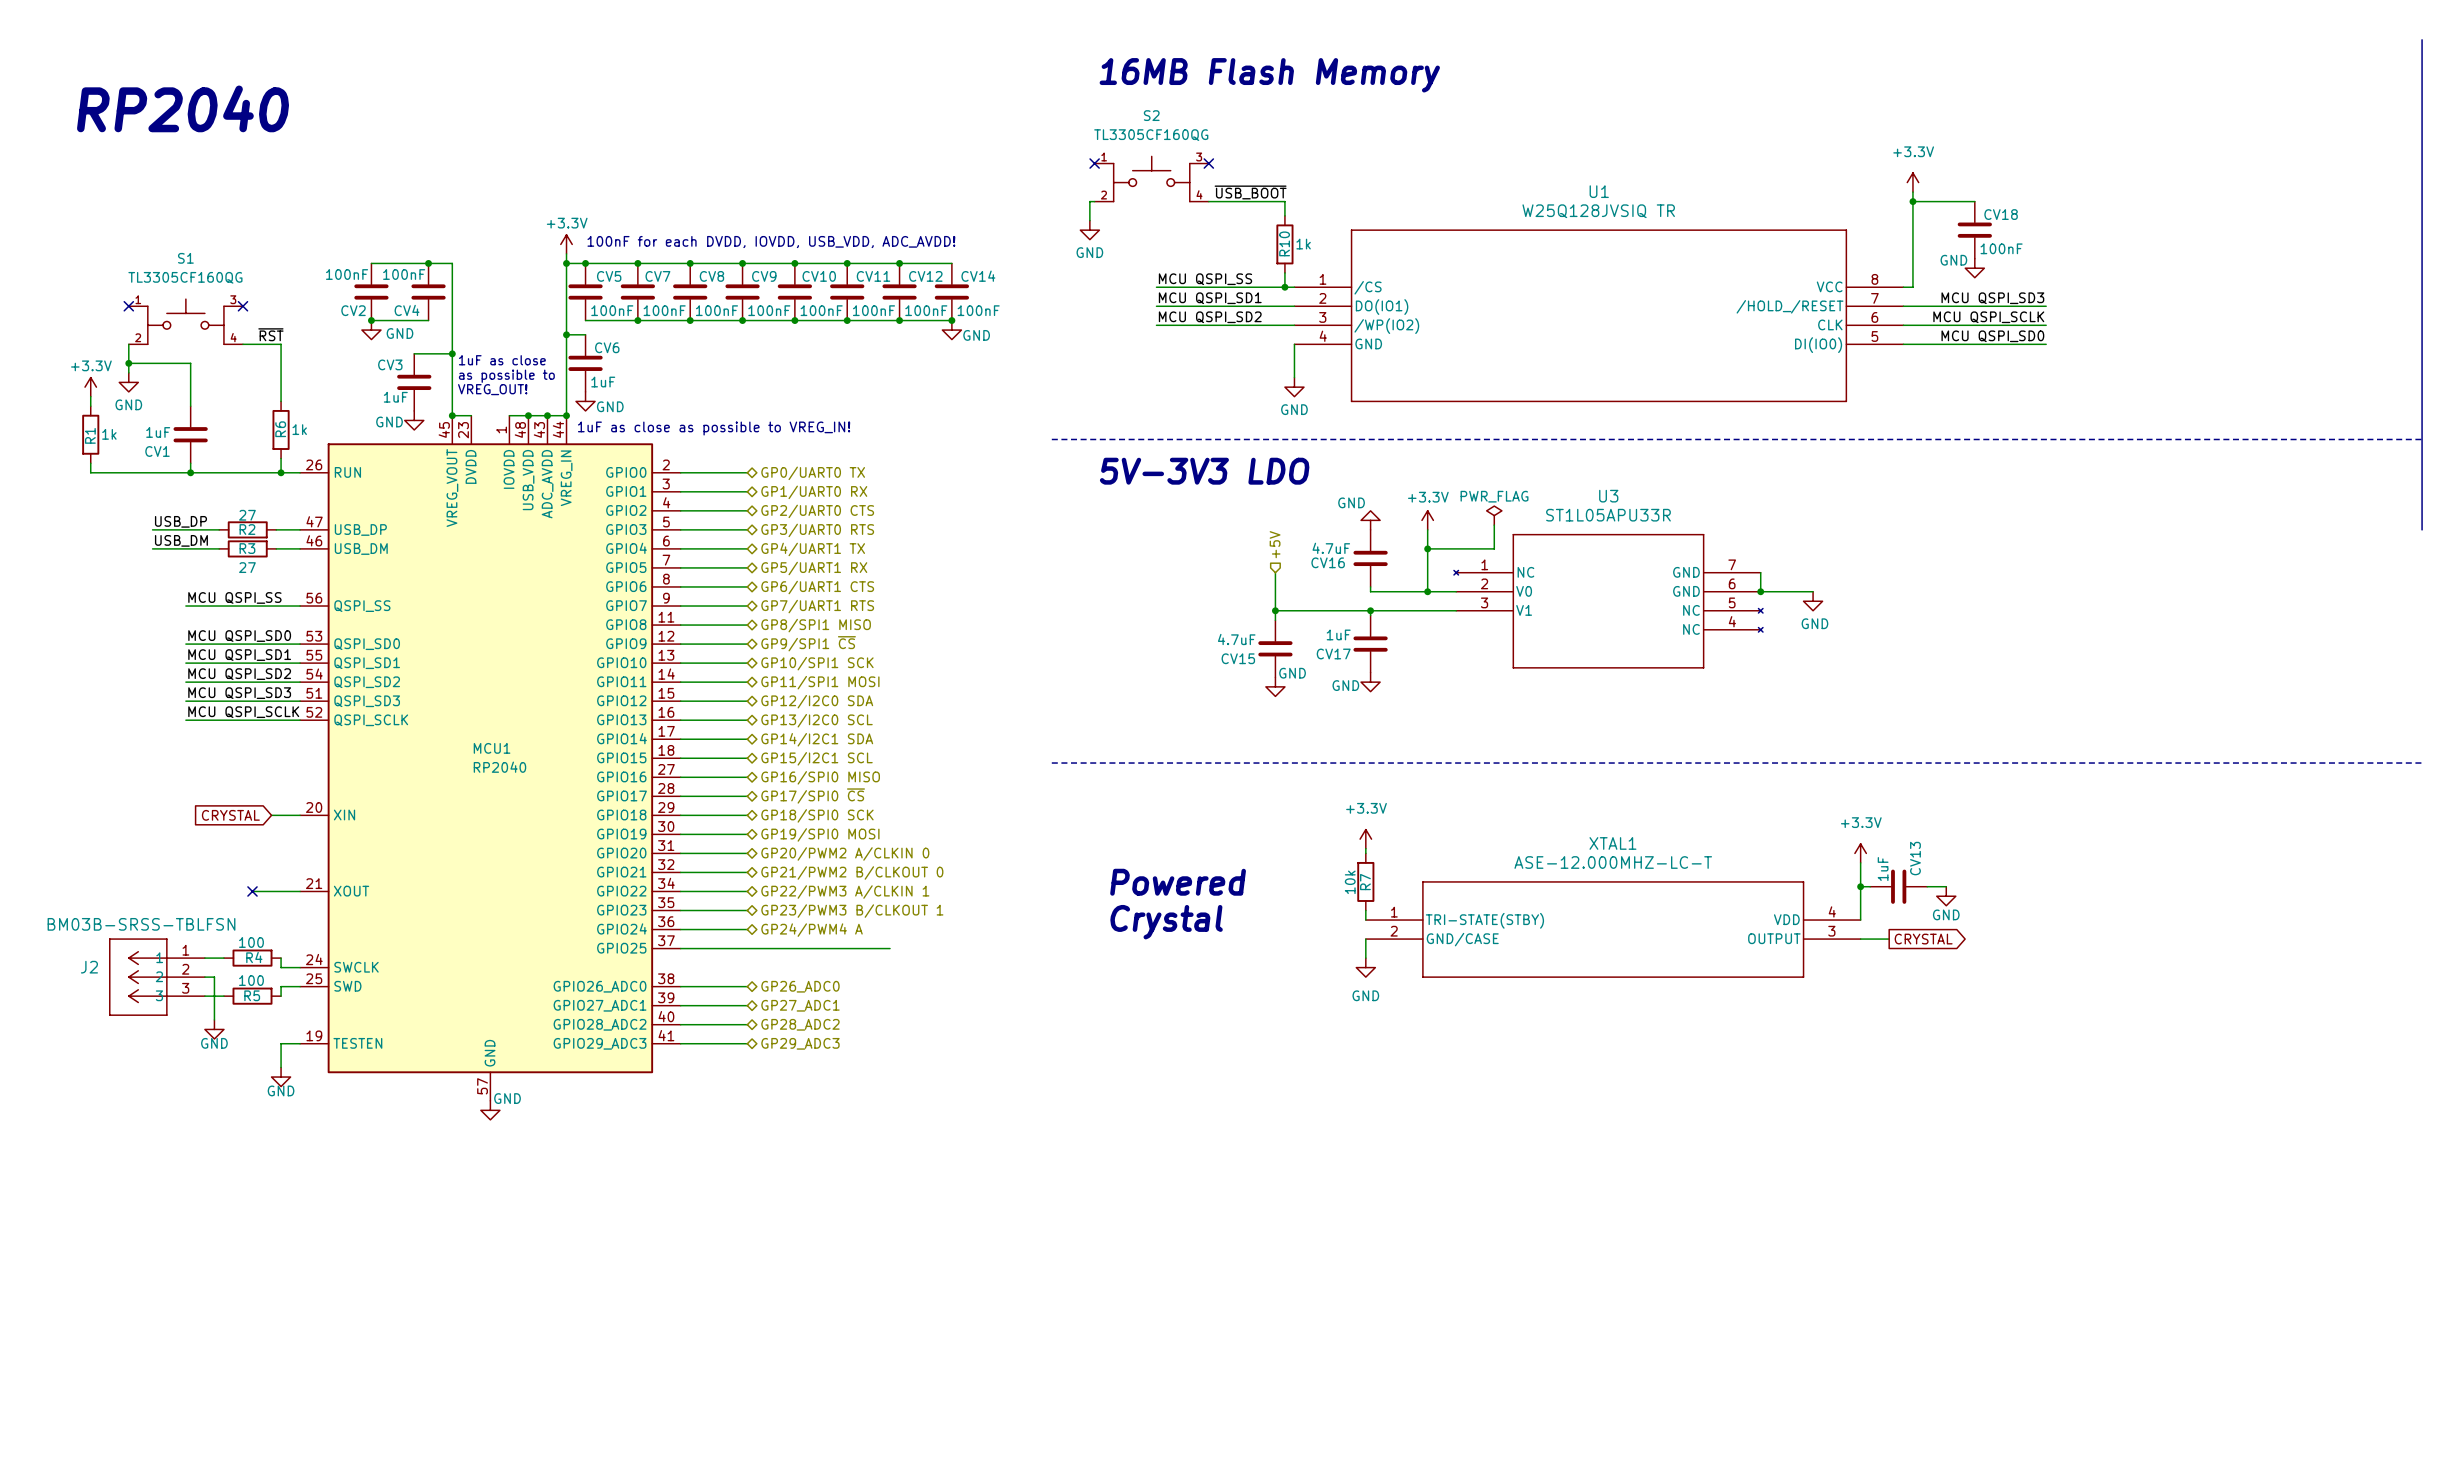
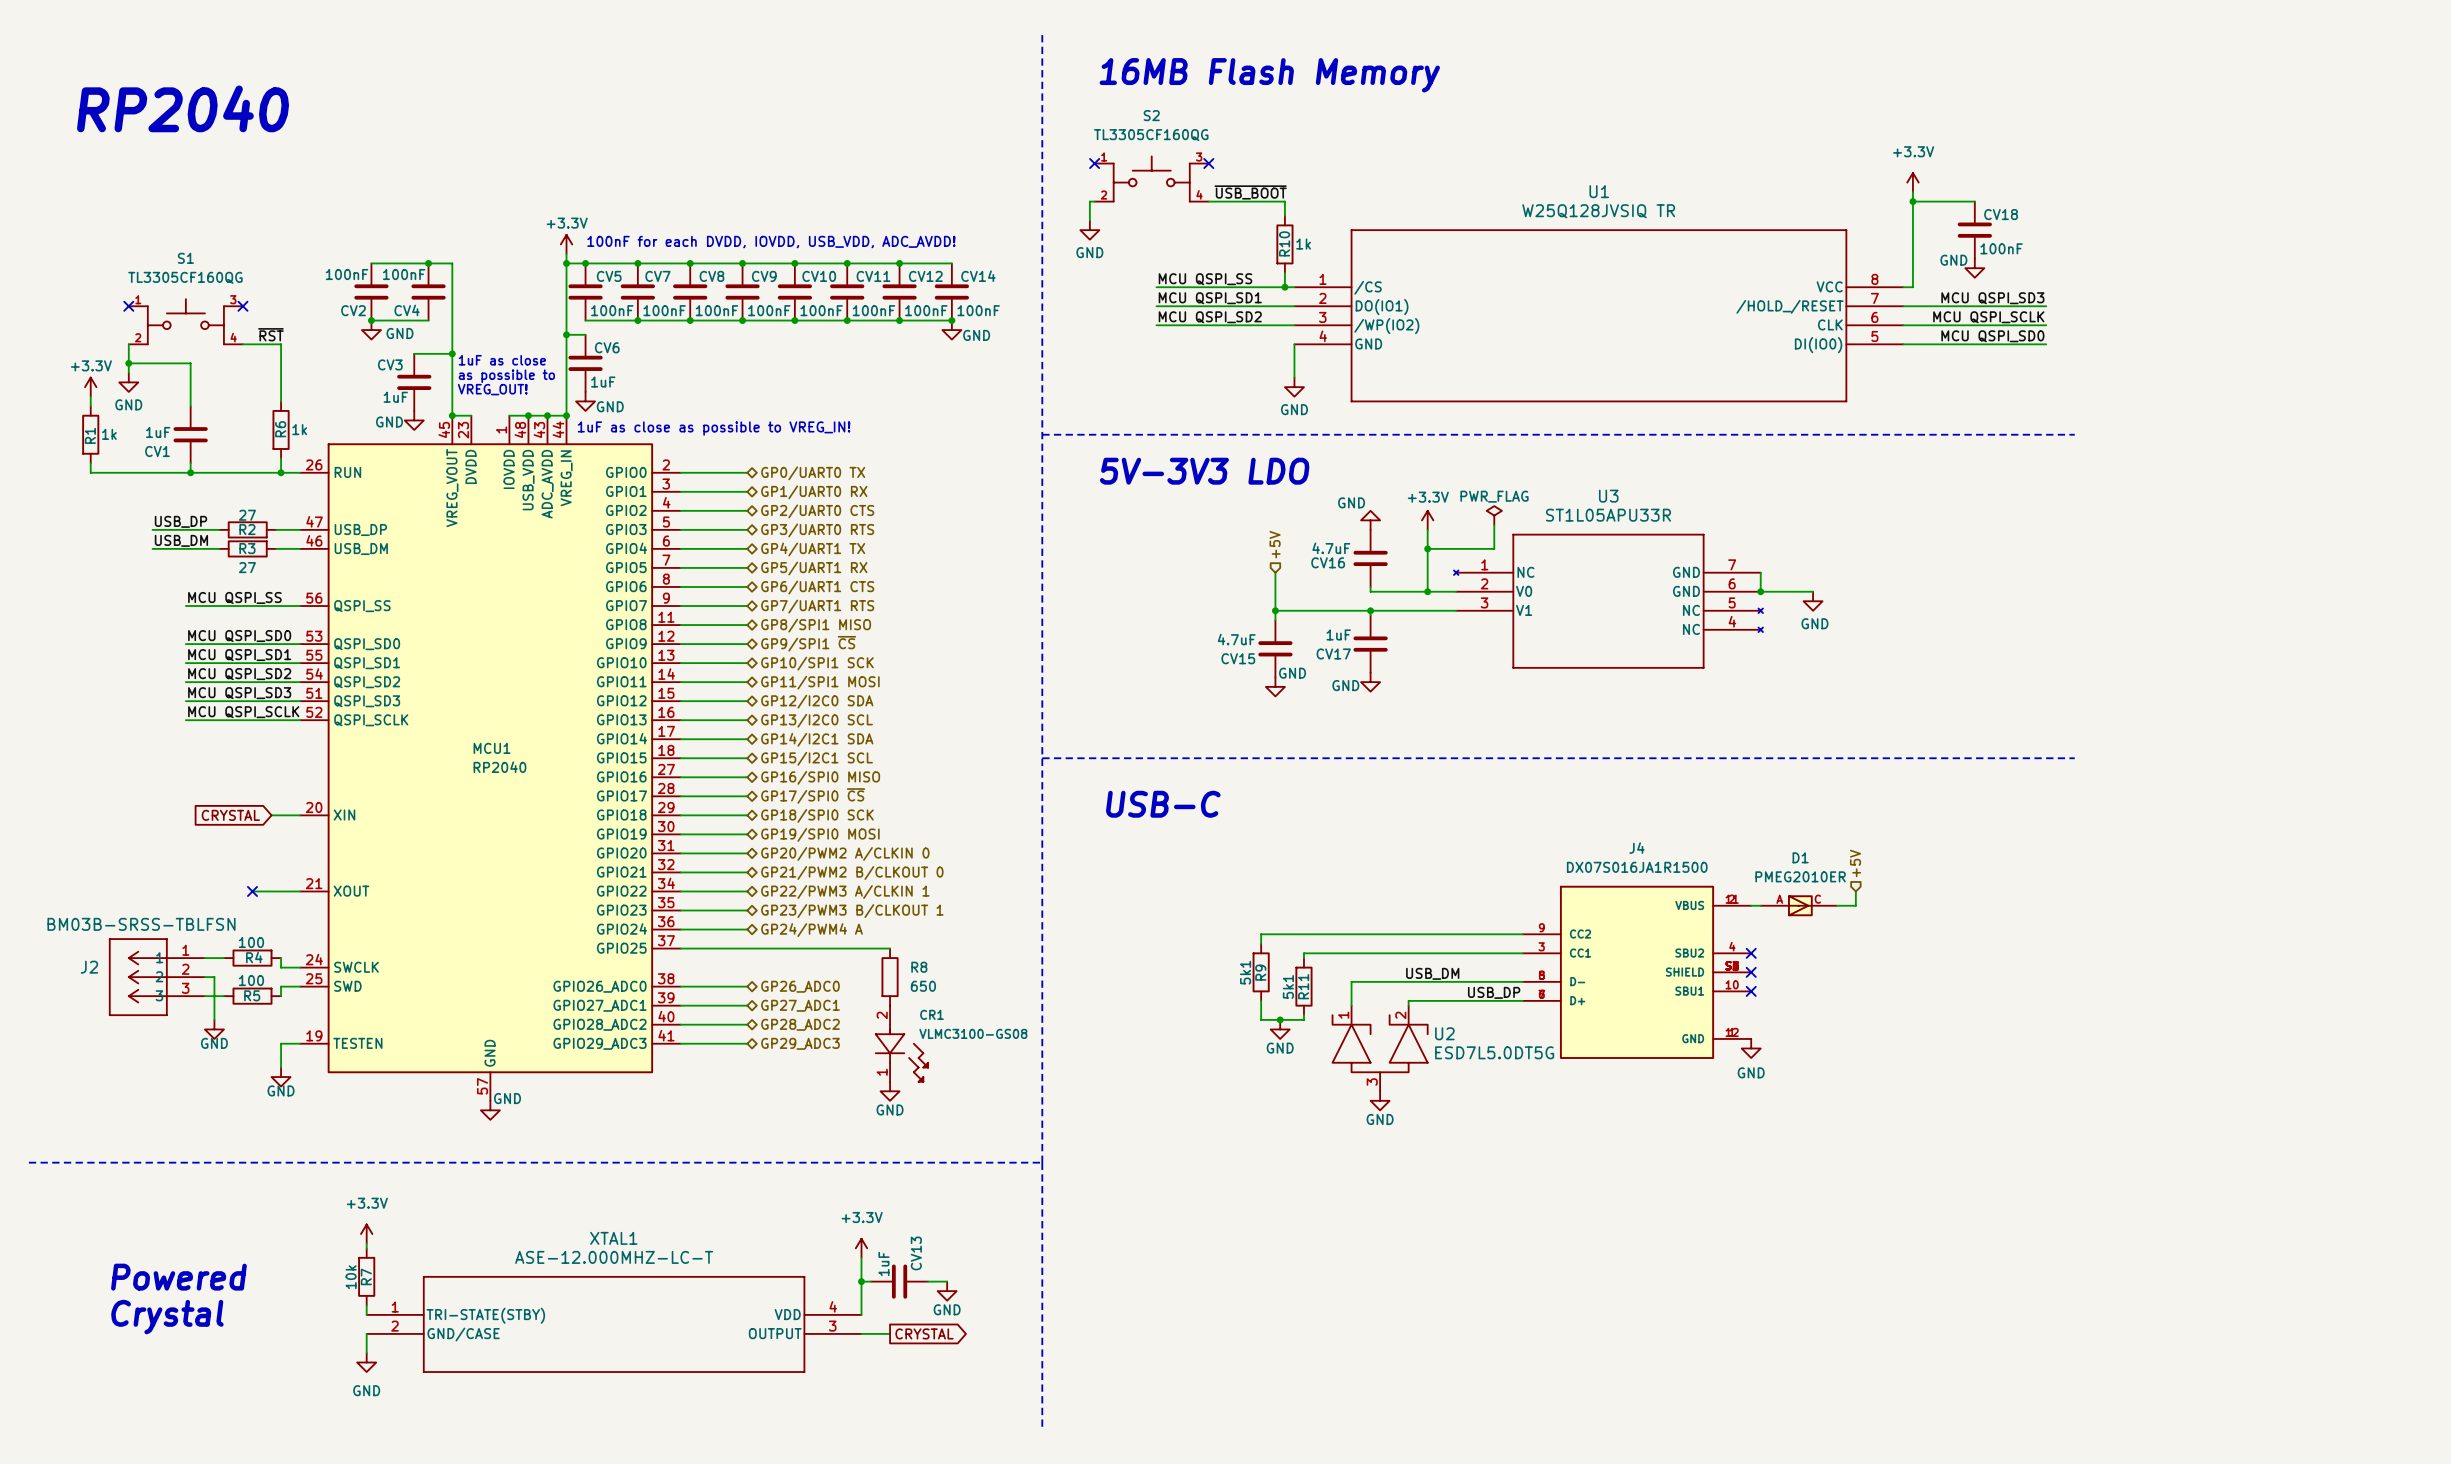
line: none -> (1042, 35) (1042, 1429)
line: (2422, 39) (2422, 529) -> none
line: none -> (1042, 434) (2074, 434)
line: (1051, 439) (2422, 439) -> none
line: none -> (1042, 758) (2074, 758)
line: (1051, 763) (2422, 763) -> none
text: none -> USB-C (1163, 804)
power symbol: +3.3V (1365, 839) -> none
wire: (1365, 848) (1365, 853) -> none
power symbol: +3.3V (1860, 853) -> none
wire: (1860, 862) (1860, 920) -> none
hierarchical label: none -> +5V (1855, 863)
R7 position: (1365, 881) -> (366, 1276)
text: Powered (1178, 882) -> none
wire: (1860, 886) (1870, 886) -> (1751, 905) (1760, 905)
junction: (1860, 886) -> none
CV13 position: (1898, 886) -> (899, 1281)
wire: (1927, 886) (1946, 886) -> none
wire: none -> (1855, 891) (1855, 905) (1836, 905)
power symbol: GND (1946, 896) -> none
D1: none -> PMEG2010ER (1798, 905)
wire: (1365, 910) (1365, 920) -> none
text: Crystal (1166, 922) -> none
XTAL1 position: (1613, 929) -> (614, 1324)
wire: none -> (1522, 934) (1261, 934) (1261, 943)
wire: (1365, 939) (1365, 958) -> none
wire: (1860, 939) (1889, 939) -> none
global label: CRYSTAL (1923, 939) -> none
wire: none -> (1522, 953) (1303, 953) (1303, 958)
no-connect mark: none -> (1751, 953)
power symbol: GND (1365, 967) -> none
R9: none -> 5k1 (1261, 972)
J4: none -> DX07S016JA1R1500 (1637, 972)
no-connect mark: none -> (1751, 972)
label: none -> USB_DM (1432, 973)
R8: none -> 650 (890, 977)
wire: none -> (1522, 981) (1351, 981) (1351, 1005)
R11: none -> 5k1 (1303, 986)
no-connect mark: none -> (1751, 991)
label: none -> USB_DP (1494, 992)
wire: none -> (1261, 1000) (1261, 1019) (1303, 1019) (1303, 1015)
wire: none -> (1522, 1000) (1408, 1000) (1408, 1005)
junction: none -> (1280, 1019)
power symbol: none -> GND (1280, 1029)
CR1: none -> VLMC3100-GS08 (901, 1044)
U2: none -> ESD7L5.0DT5G (1380, 1048)
power symbol: none -> GND (1751, 1048)
power symbol: none -> GND (890, 1091)
power symbol: none -> GND (1380, 1100)
line: none -> (28, 1162) (1042, 1162)
power symbol: none -> +3.3V (366, 1234)
wire: none -> (366, 1243) (366, 1248)
power symbol: none -> +3.3V (861, 1248)
wire: none -> (861, 1257) (861, 1314)
text: none -> Powered (178, 1277)
wire: none -> (861, 1281) (871, 1281)
junction: none -> (861, 1281)
wire: none -> (928, 1281) (947, 1281)
power symbol: none -> GND (947, 1291)
wire: none -> (366, 1305) (366, 1314)
text: none -> Crystal (167, 1317)
wire: none -> (366, 1333) (366, 1352)
wire: none -> (861, 1333) (890, 1333)
global label: none -> CRYSTAL (924, 1333)
power symbol: none -> GND (366, 1362)

